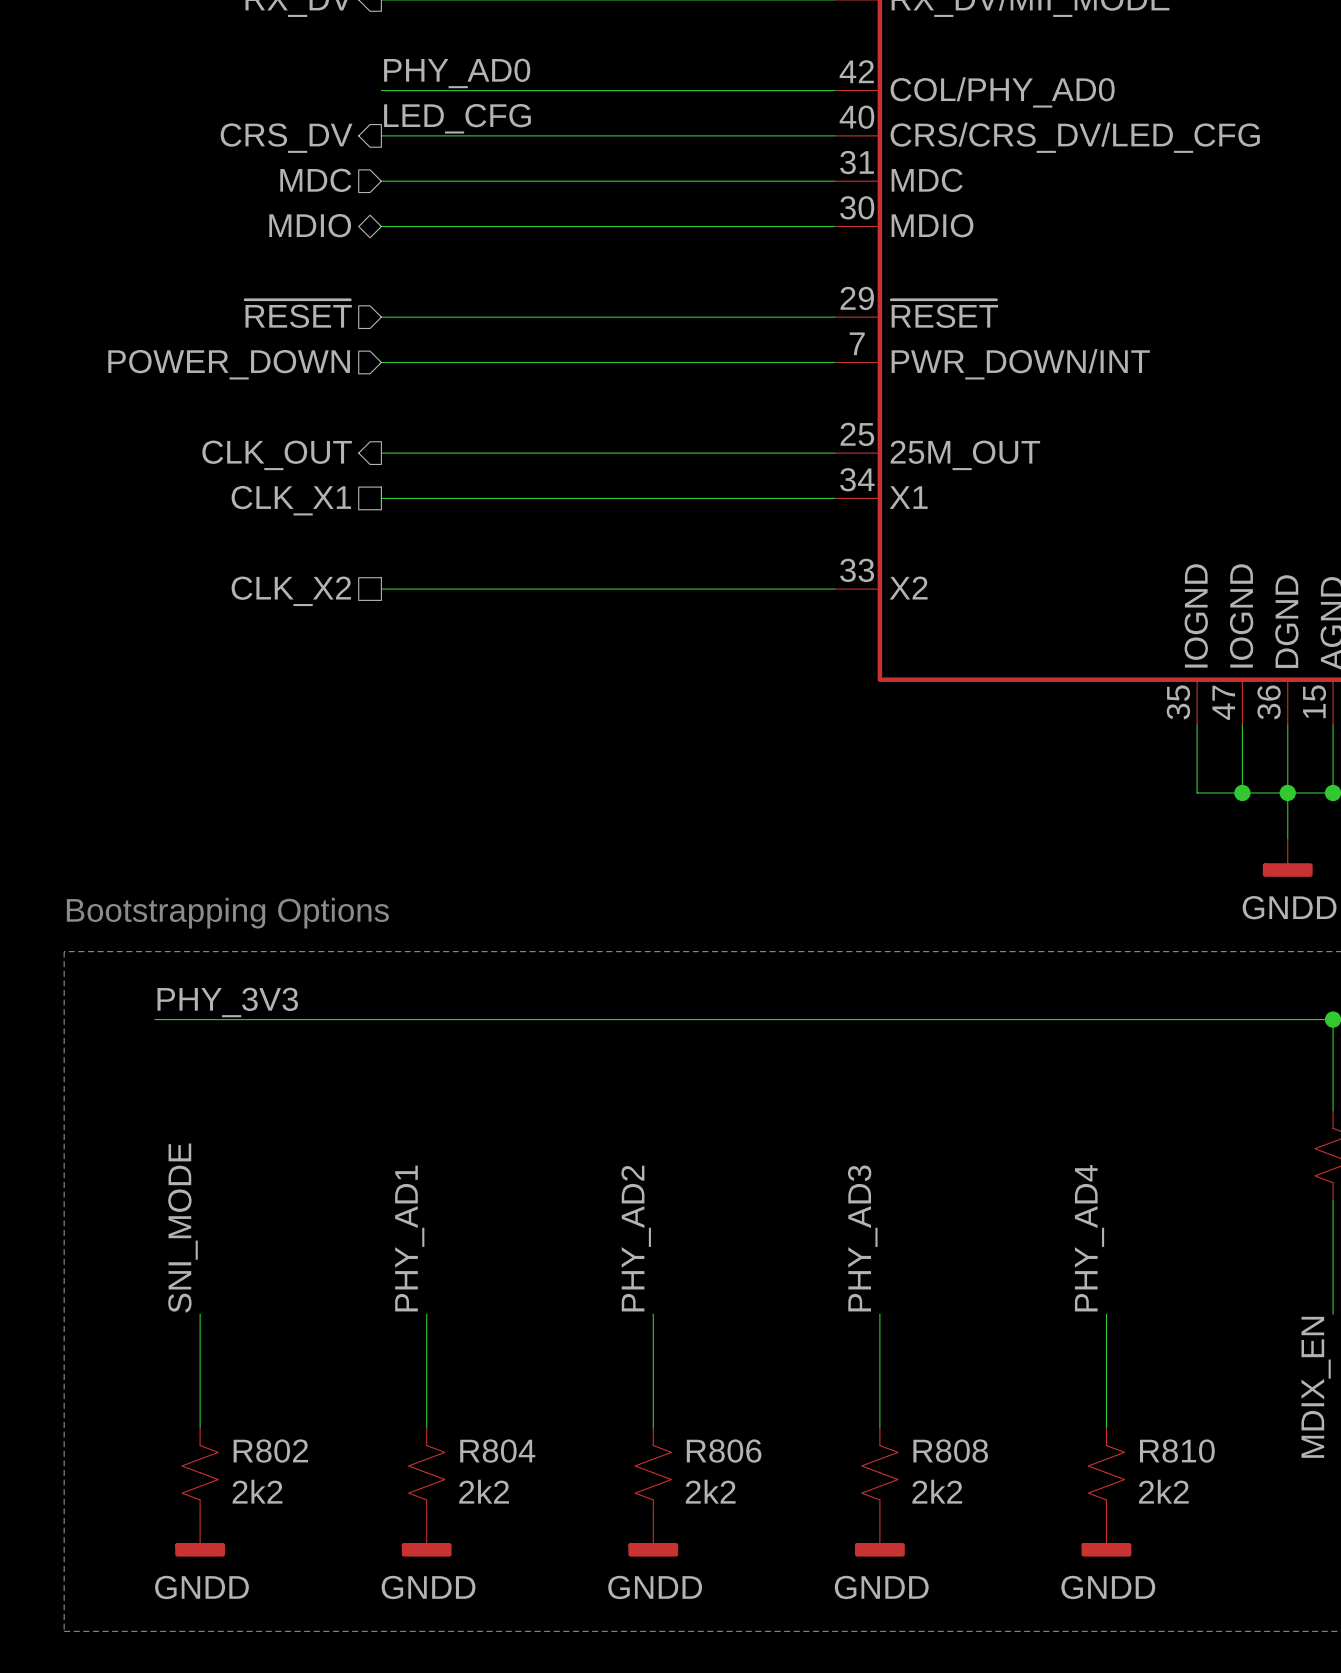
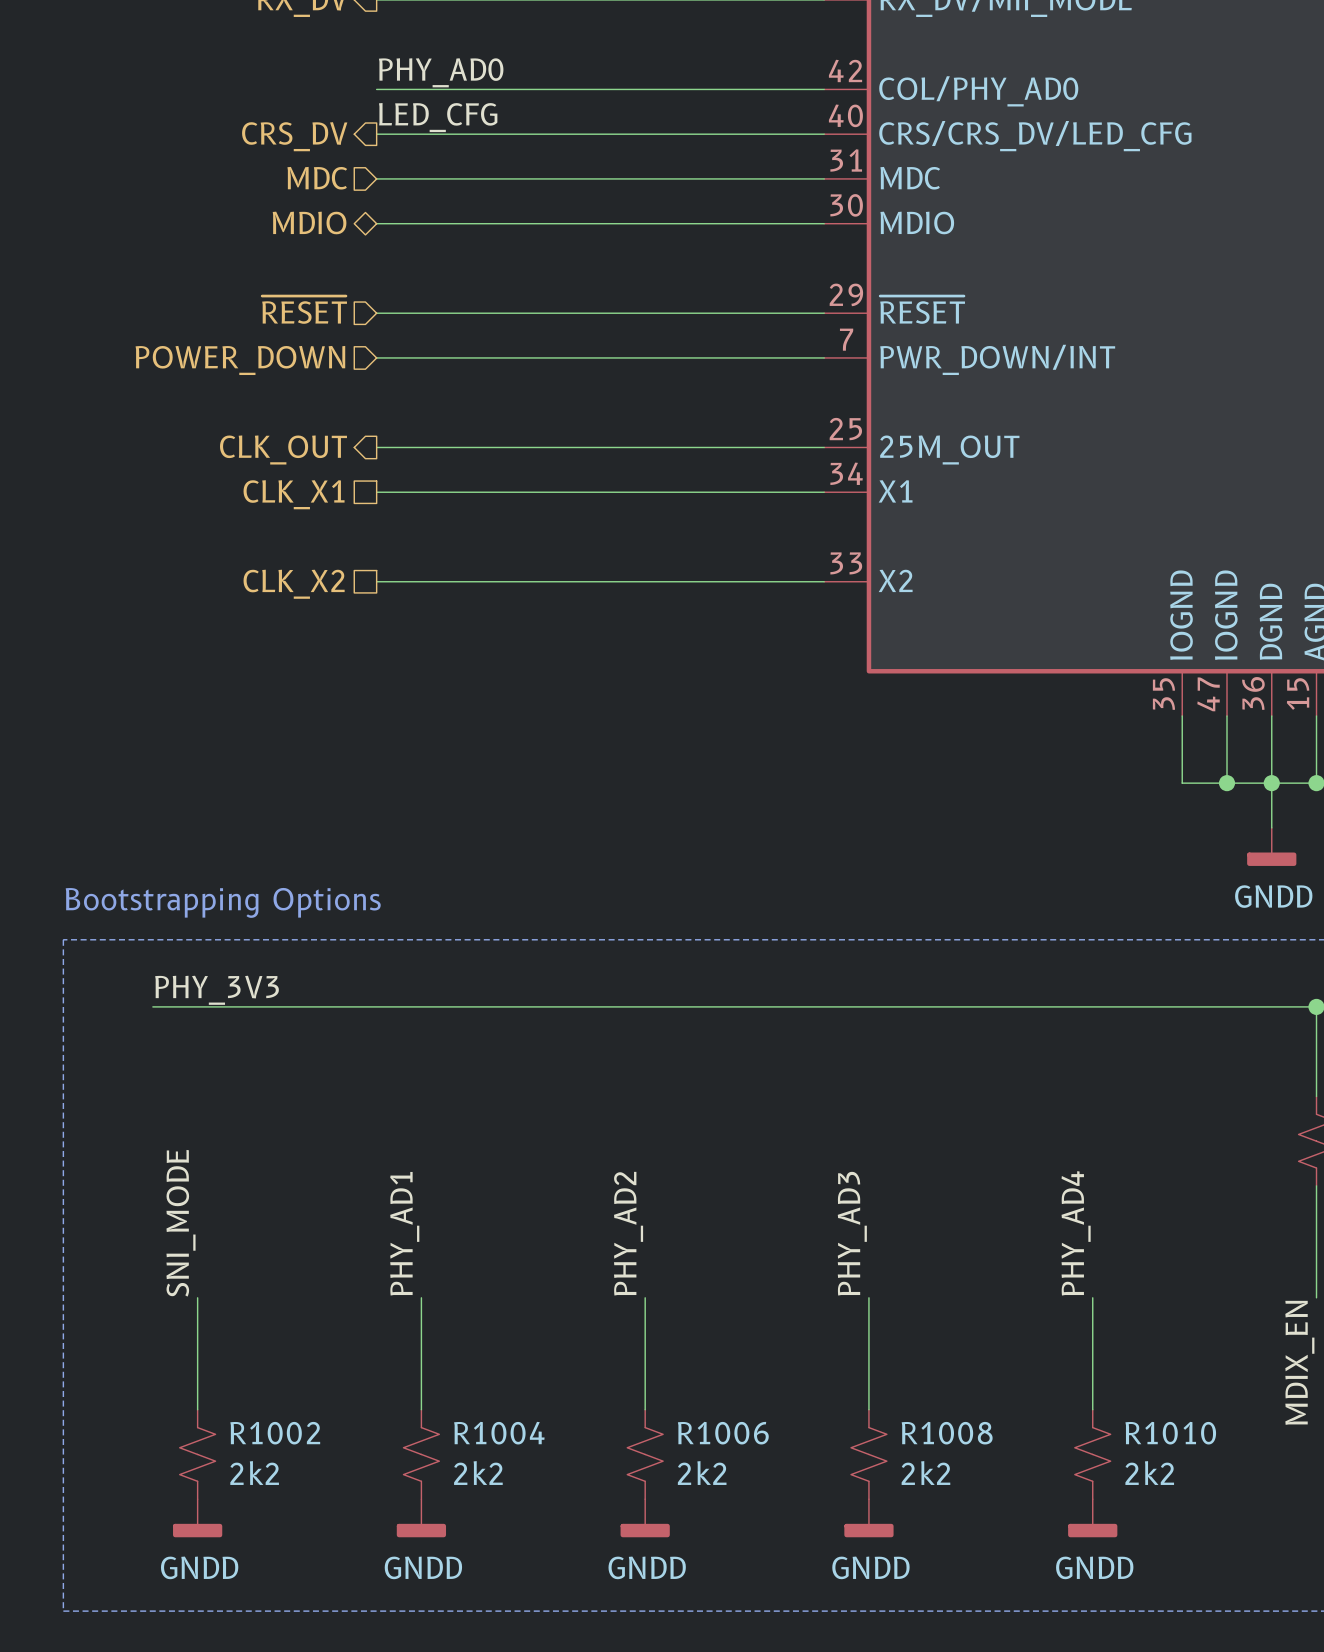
R802 name: R802 (270, 1451) -> R1002 (275, 1433)
R804 name: R804 (497, 1451) -> R1004 (499, 1433)
R806 name: R806 (724, 1451) -> R1006 (723, 1433)
R808 name: R808 (950, 1451) -> R1008 (947, 1433)
R810 name: R810 (1177, 1451) -> R1010 (1170, 1433)

